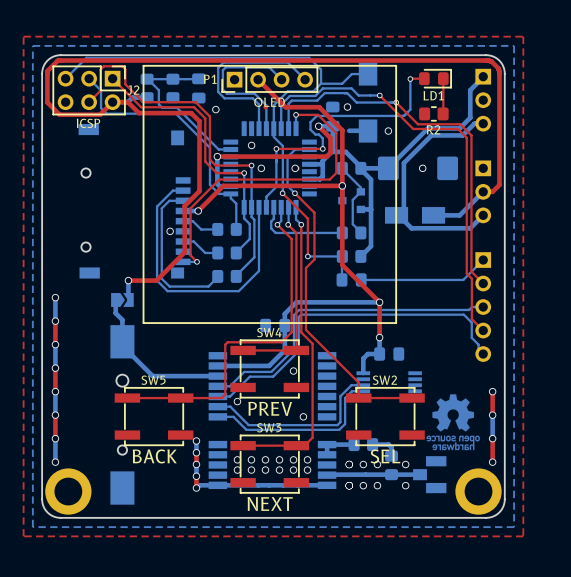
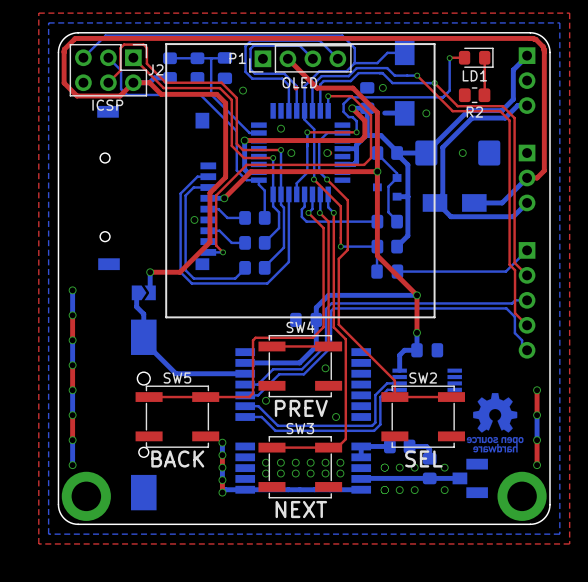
bottom track: (147, 79) (158, 90) (158, 104) (162, 107) (177, 107) (218, 149) (221, 149) -> (210, 58) (211, 94) (249, 132)

